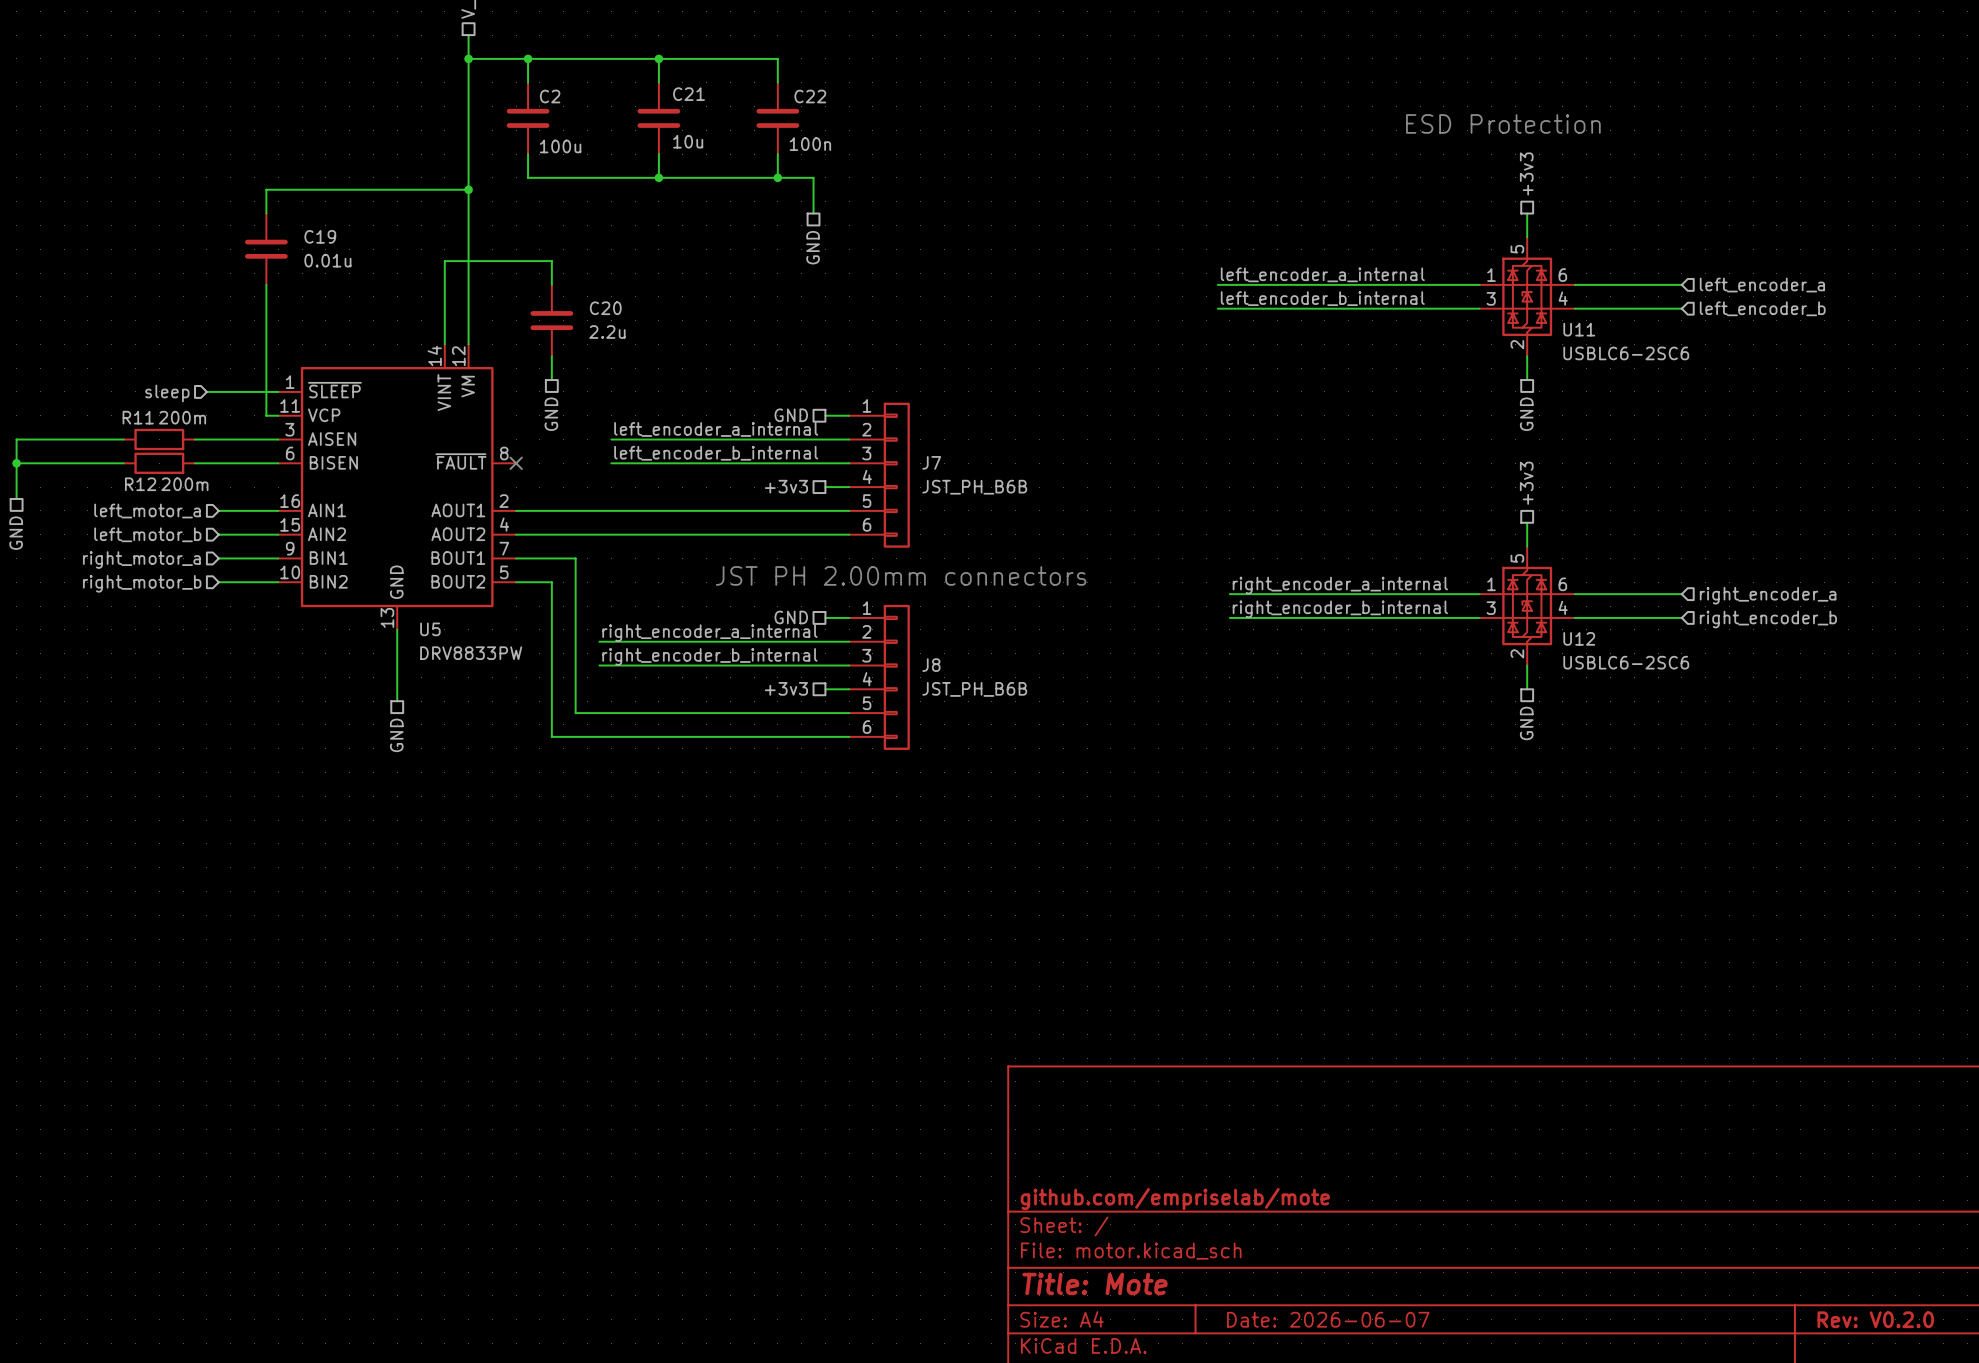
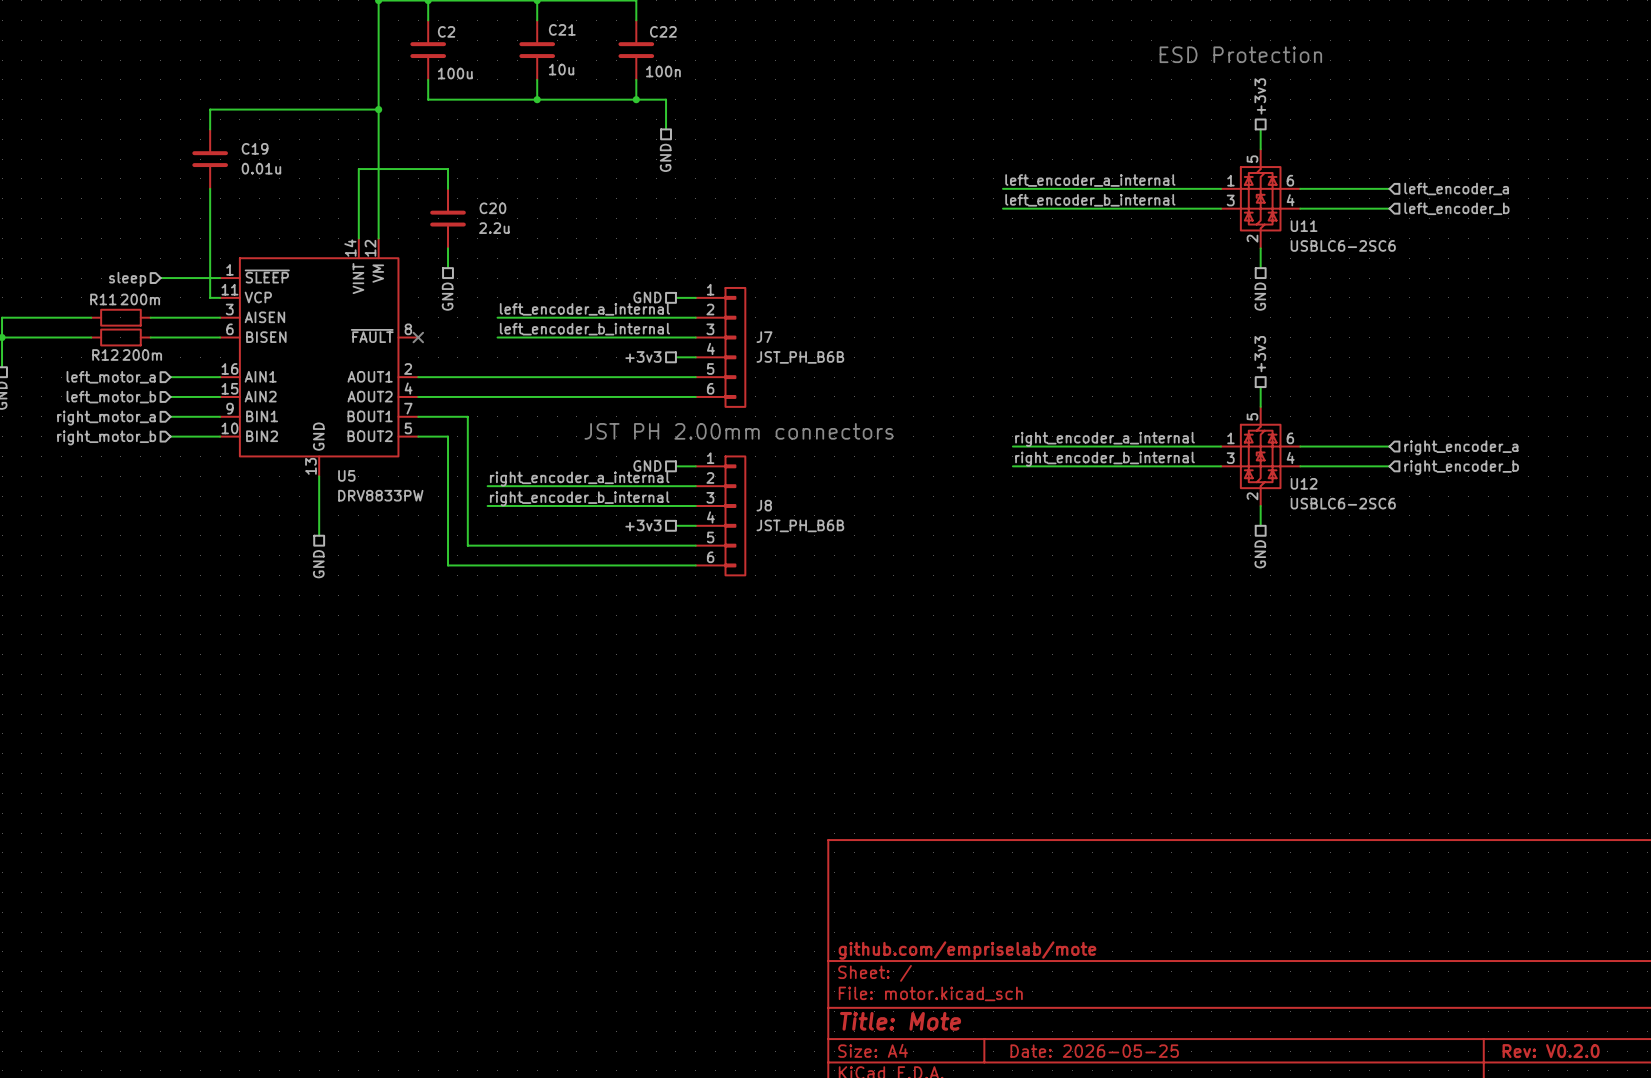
title block: Date: 2026-06-07 (1328, 1319) -> Date: 2026-05-25 (1094, 1051)

